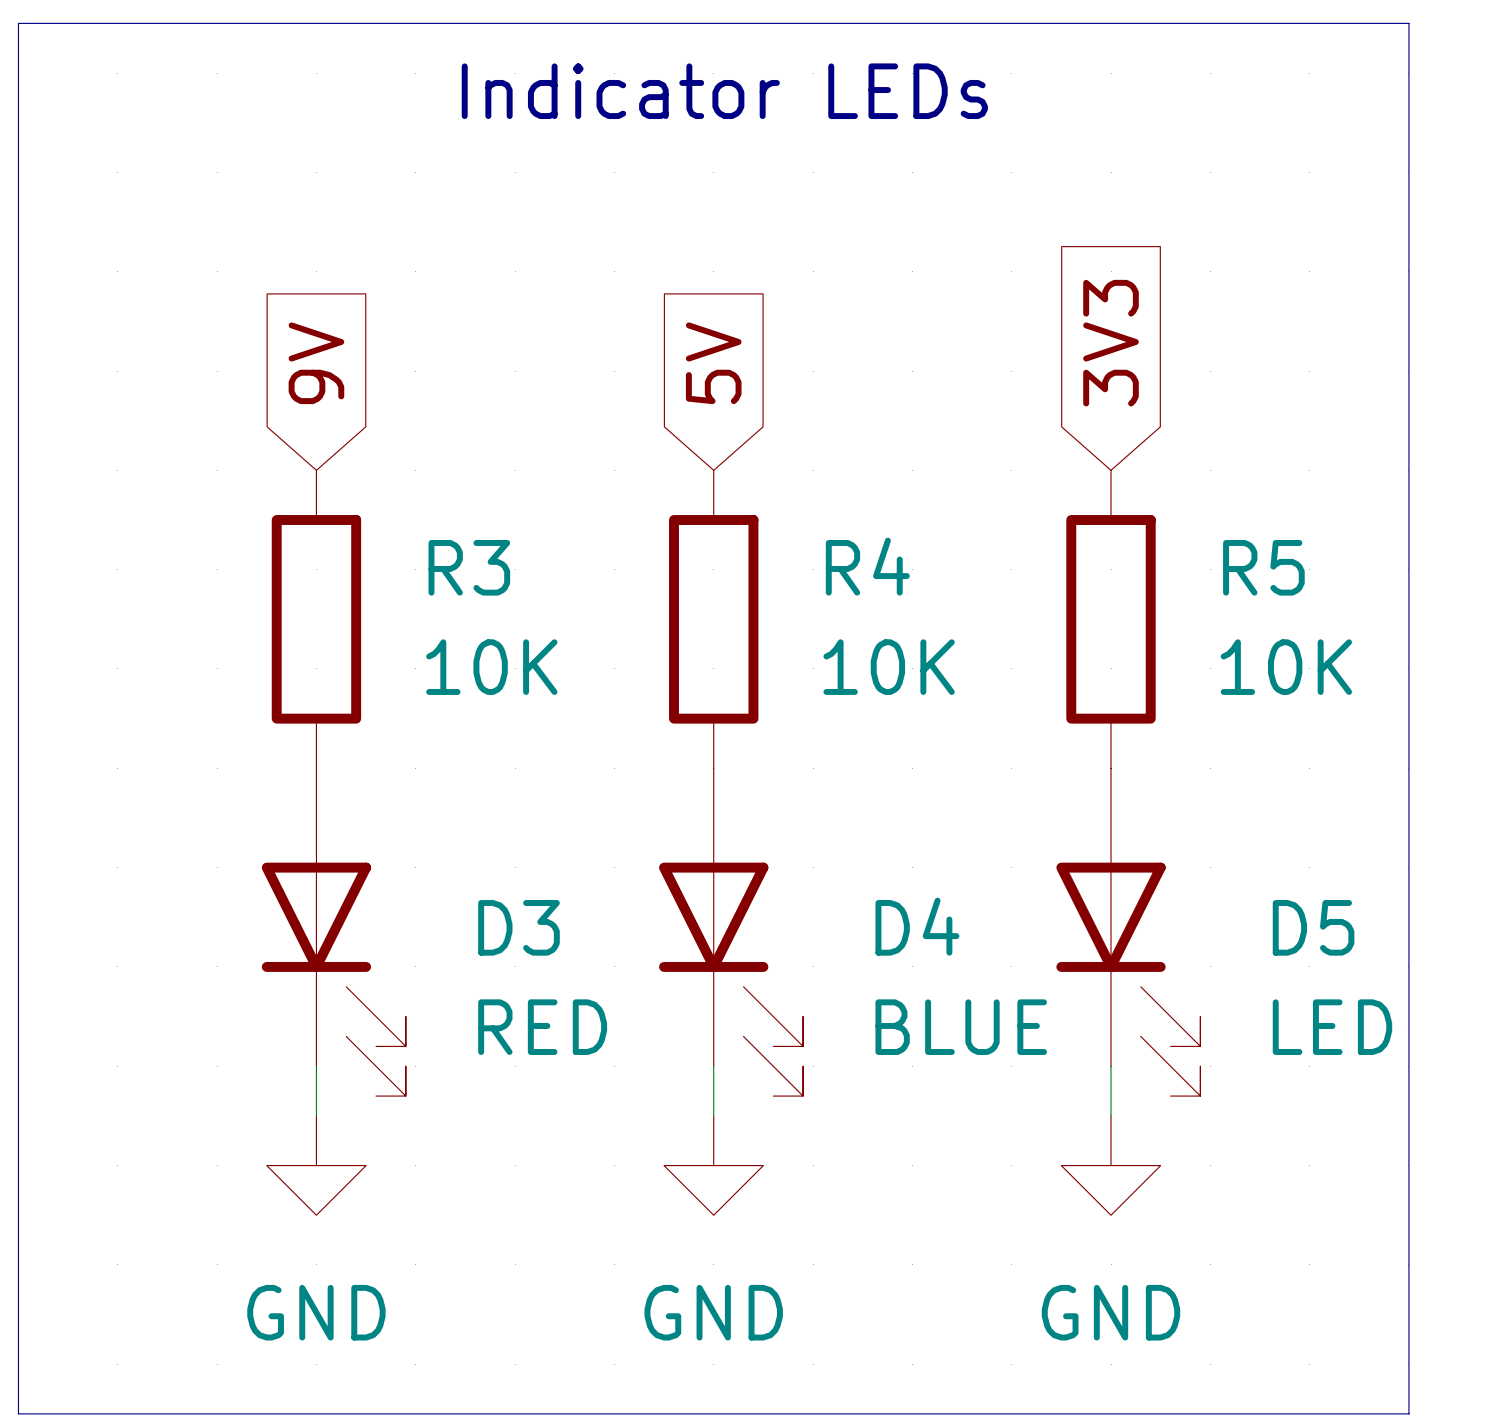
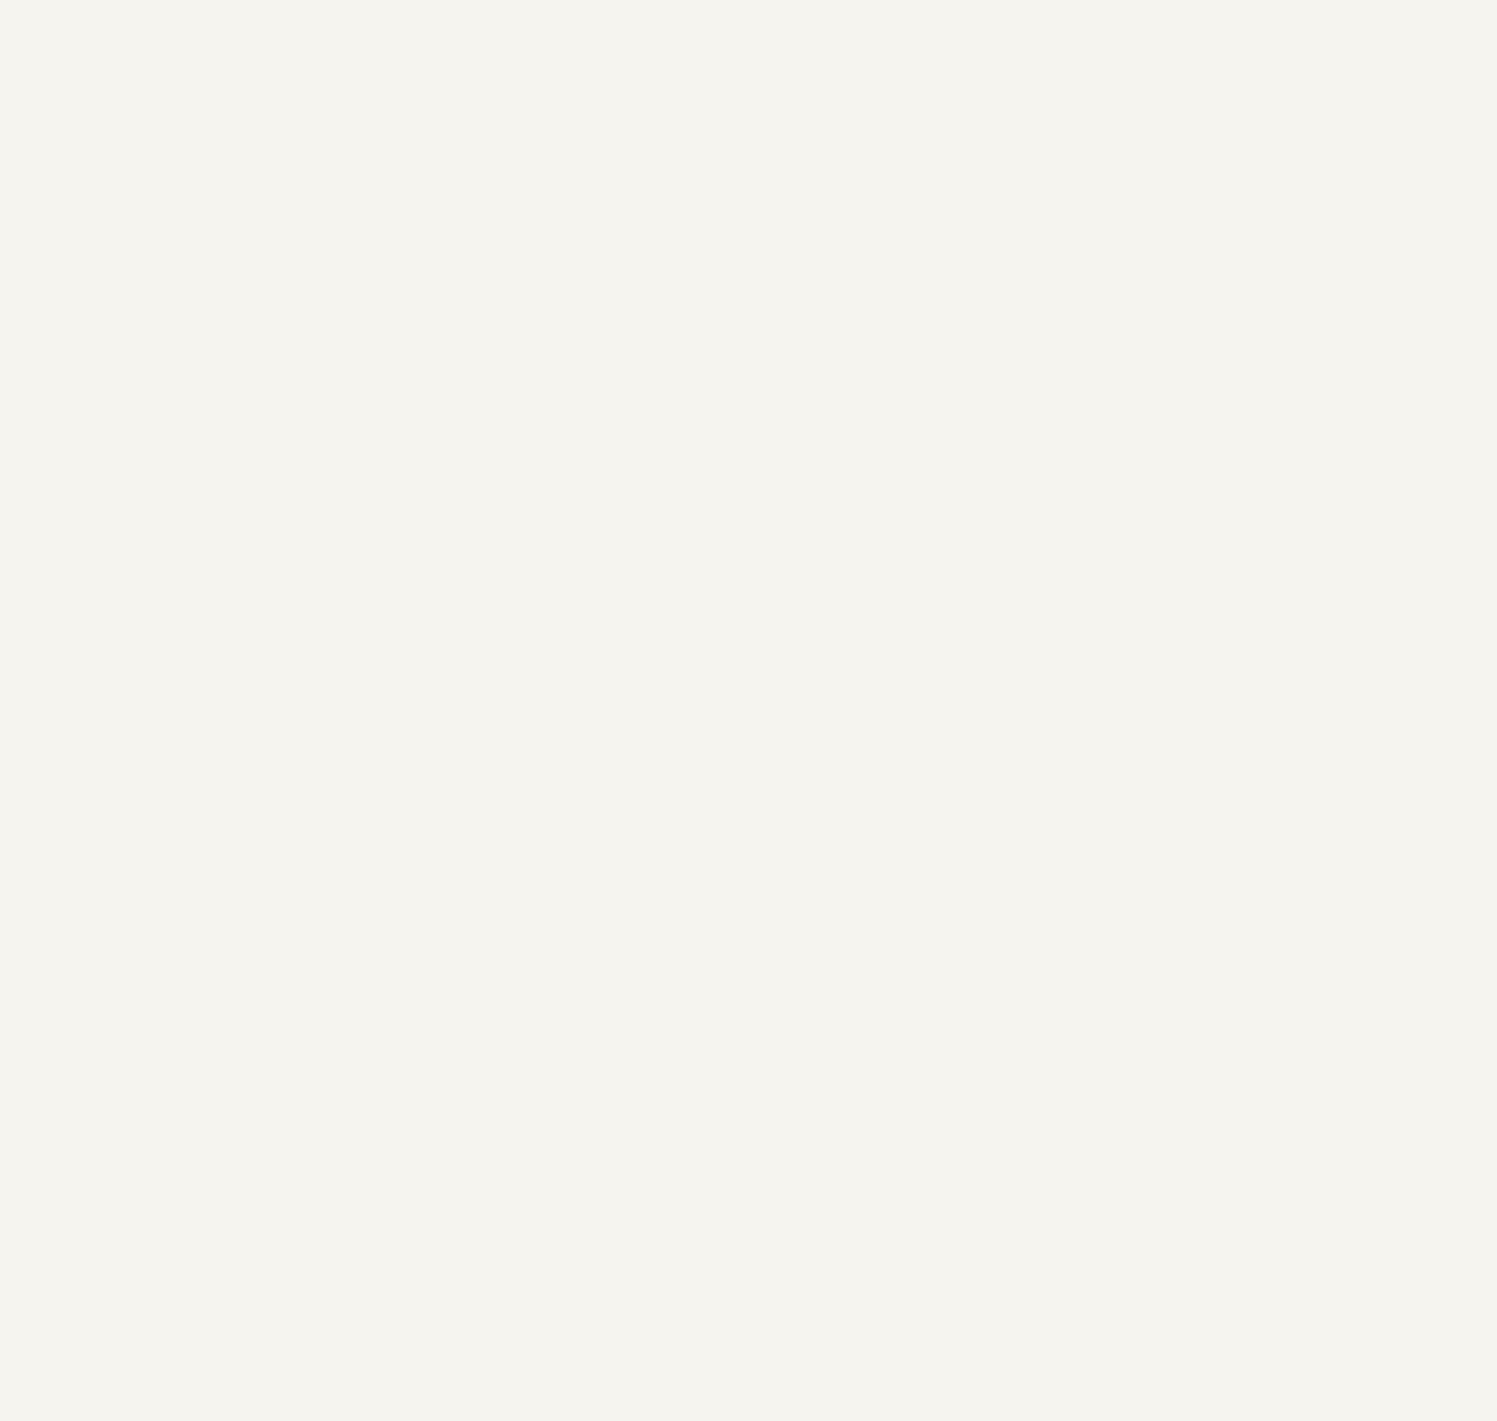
line: (18, 23) (1408, 23) (1408, 1413) (18, 1413) (18, 23) -> none
text: Indicator LEDs (724, 91) -> none
global label: 3V3 (1111, 343) -> none
global label: 9V (316, 363) -> none
global label: 5V (713, 363) -> none
R3: 10K (316, 619) -> none
R4: 10K (713, 619) -> none
R5: 10K (1111, 619) -> none
D3: RED (333, 932) -> none
D4: BLUE (731, 932) -> none
D5: LED (1128, 932) -> none
wire: (316, 1066) (316, 1115) -> none
wire: (713, 1066) (713, 1115) -> none
wire: (1111, 1066) (1111, 1115) -> none
power symbol: GND (316, 1165) -> none
power symbol: GND (713, 1165) -> none
power symbol: GND (1111, 1165) -> none

